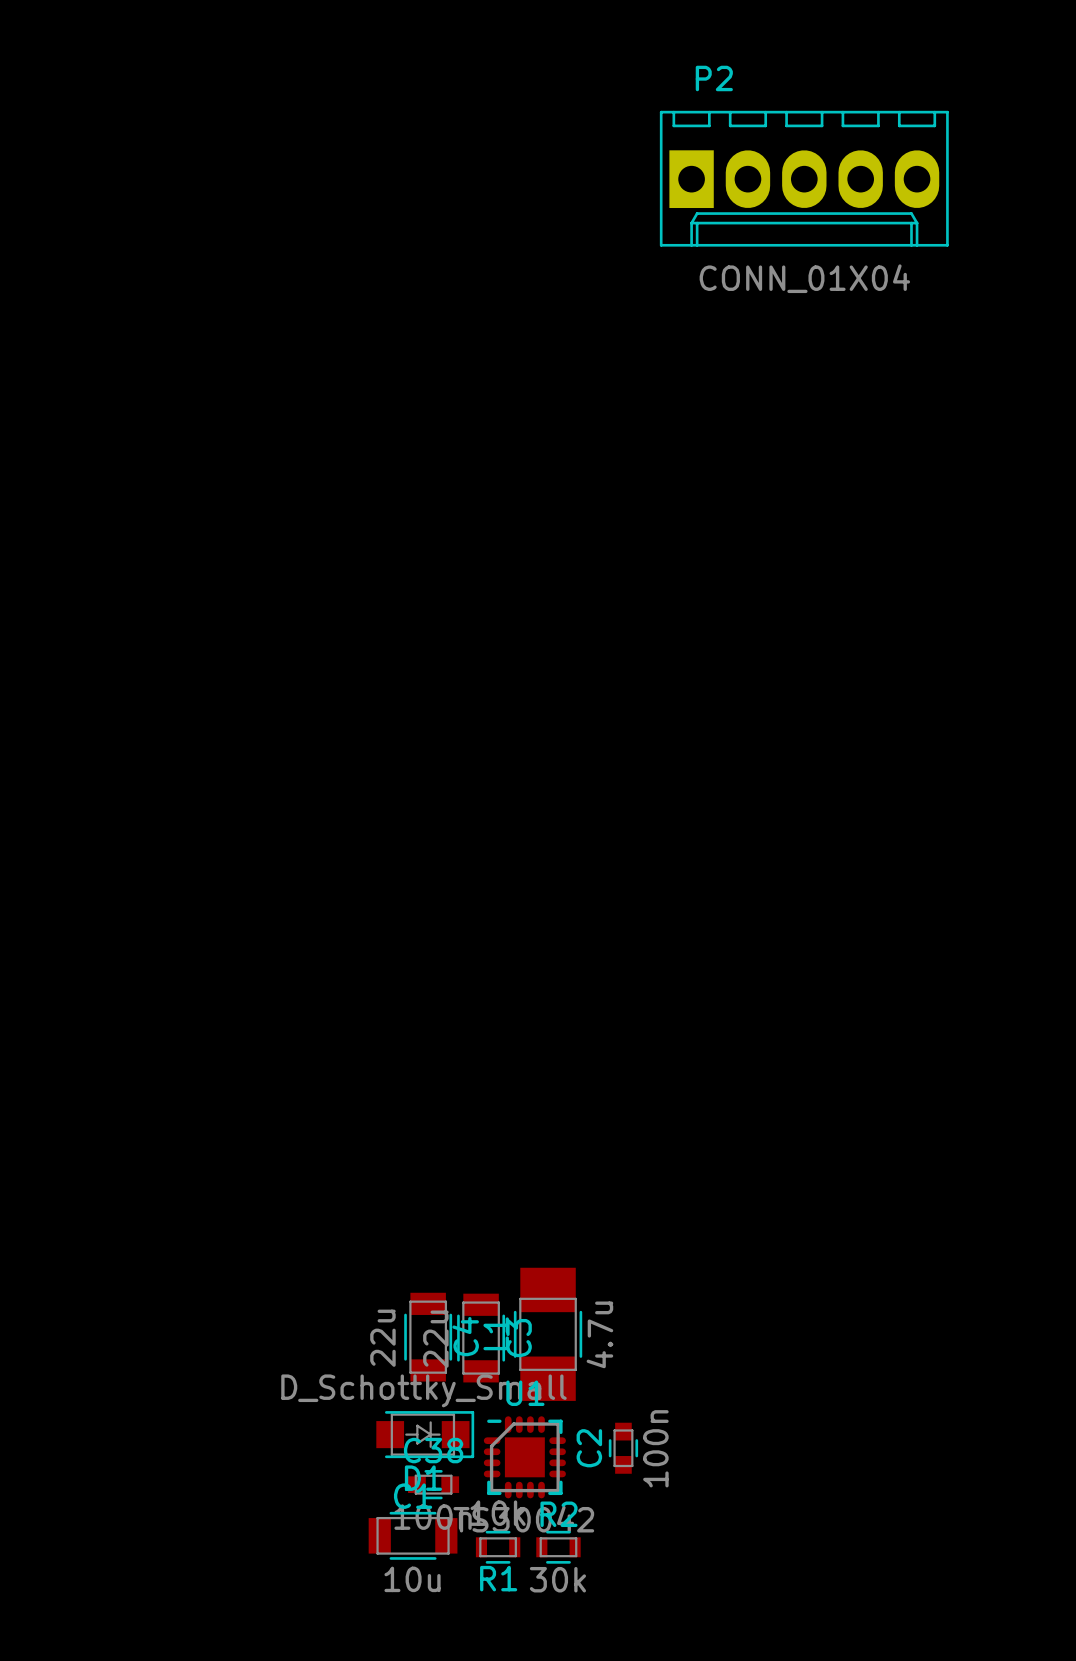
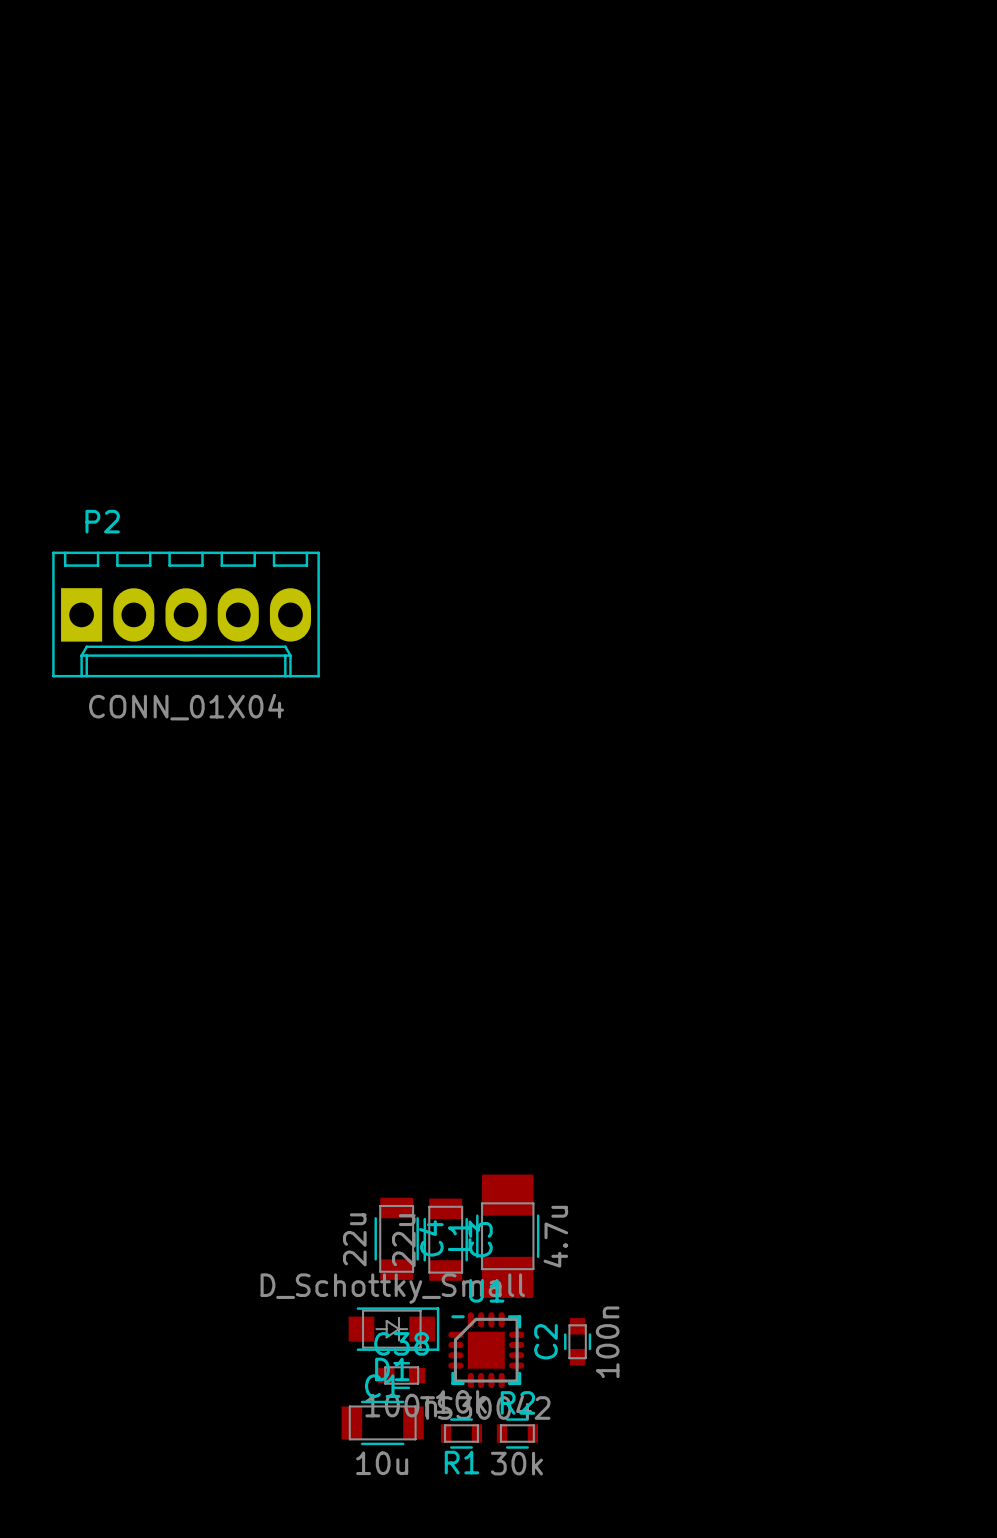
P2 position: (804, 178) -> (186, 614)

